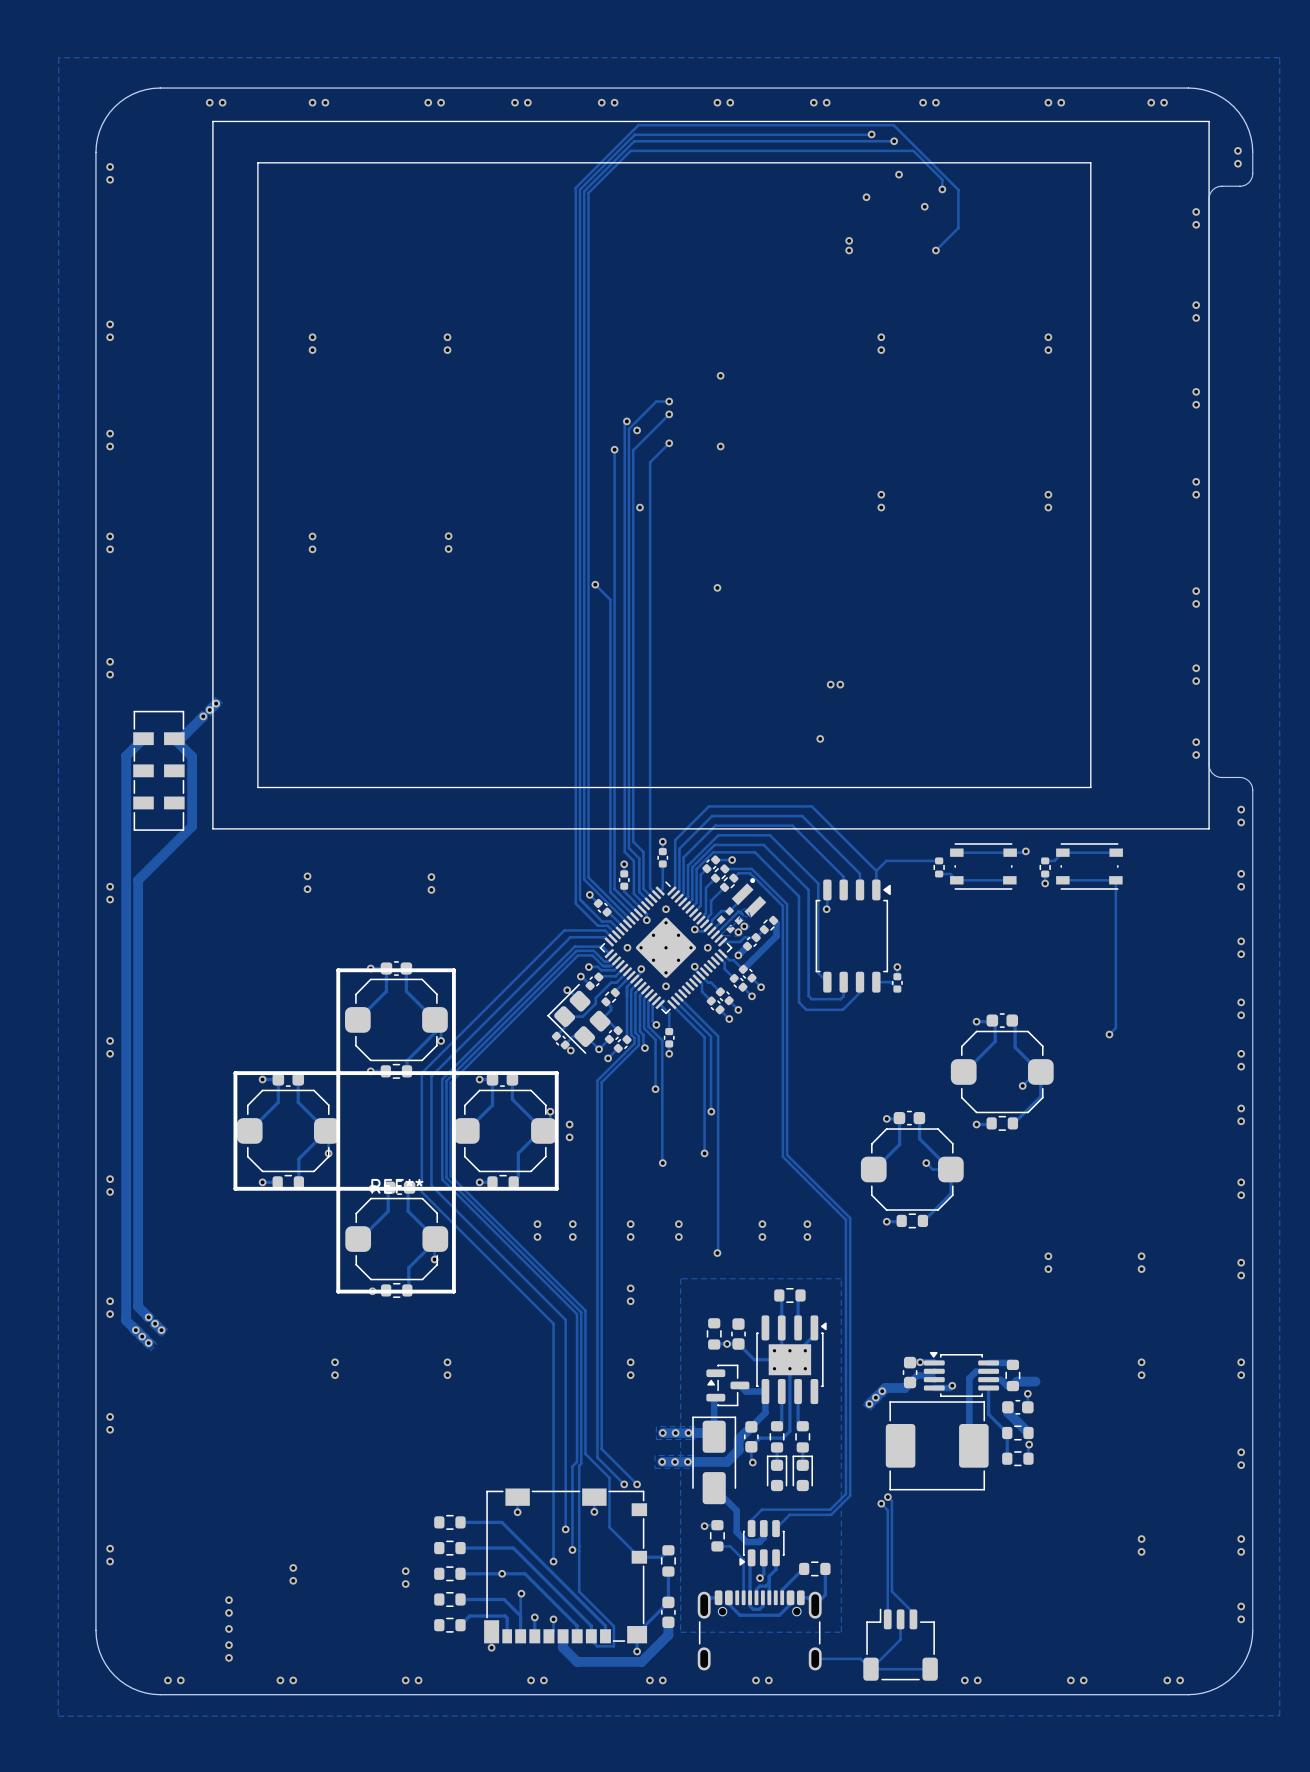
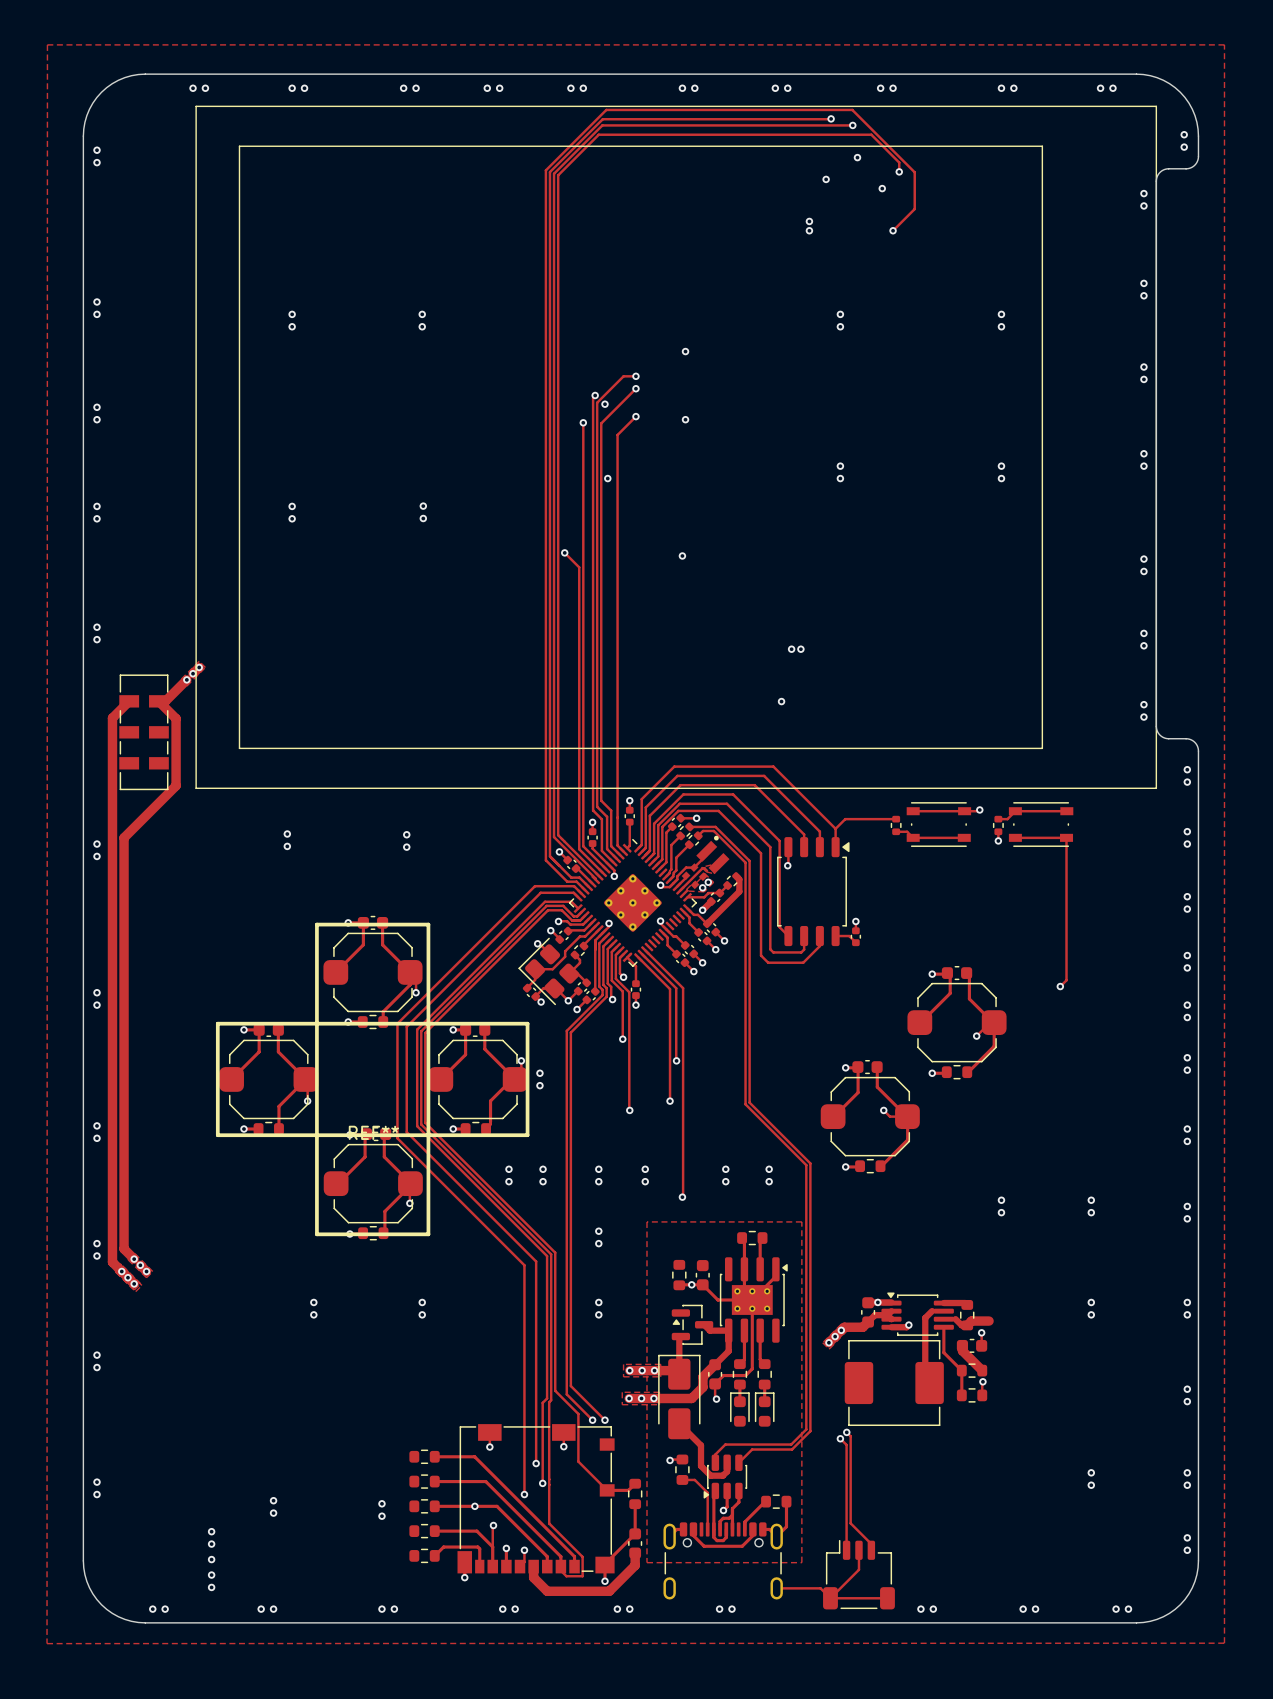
via: (666, 909) -> none
via: (627, 947) -> none
via: (707, 947) -> none
via: (666, 986) -> none

